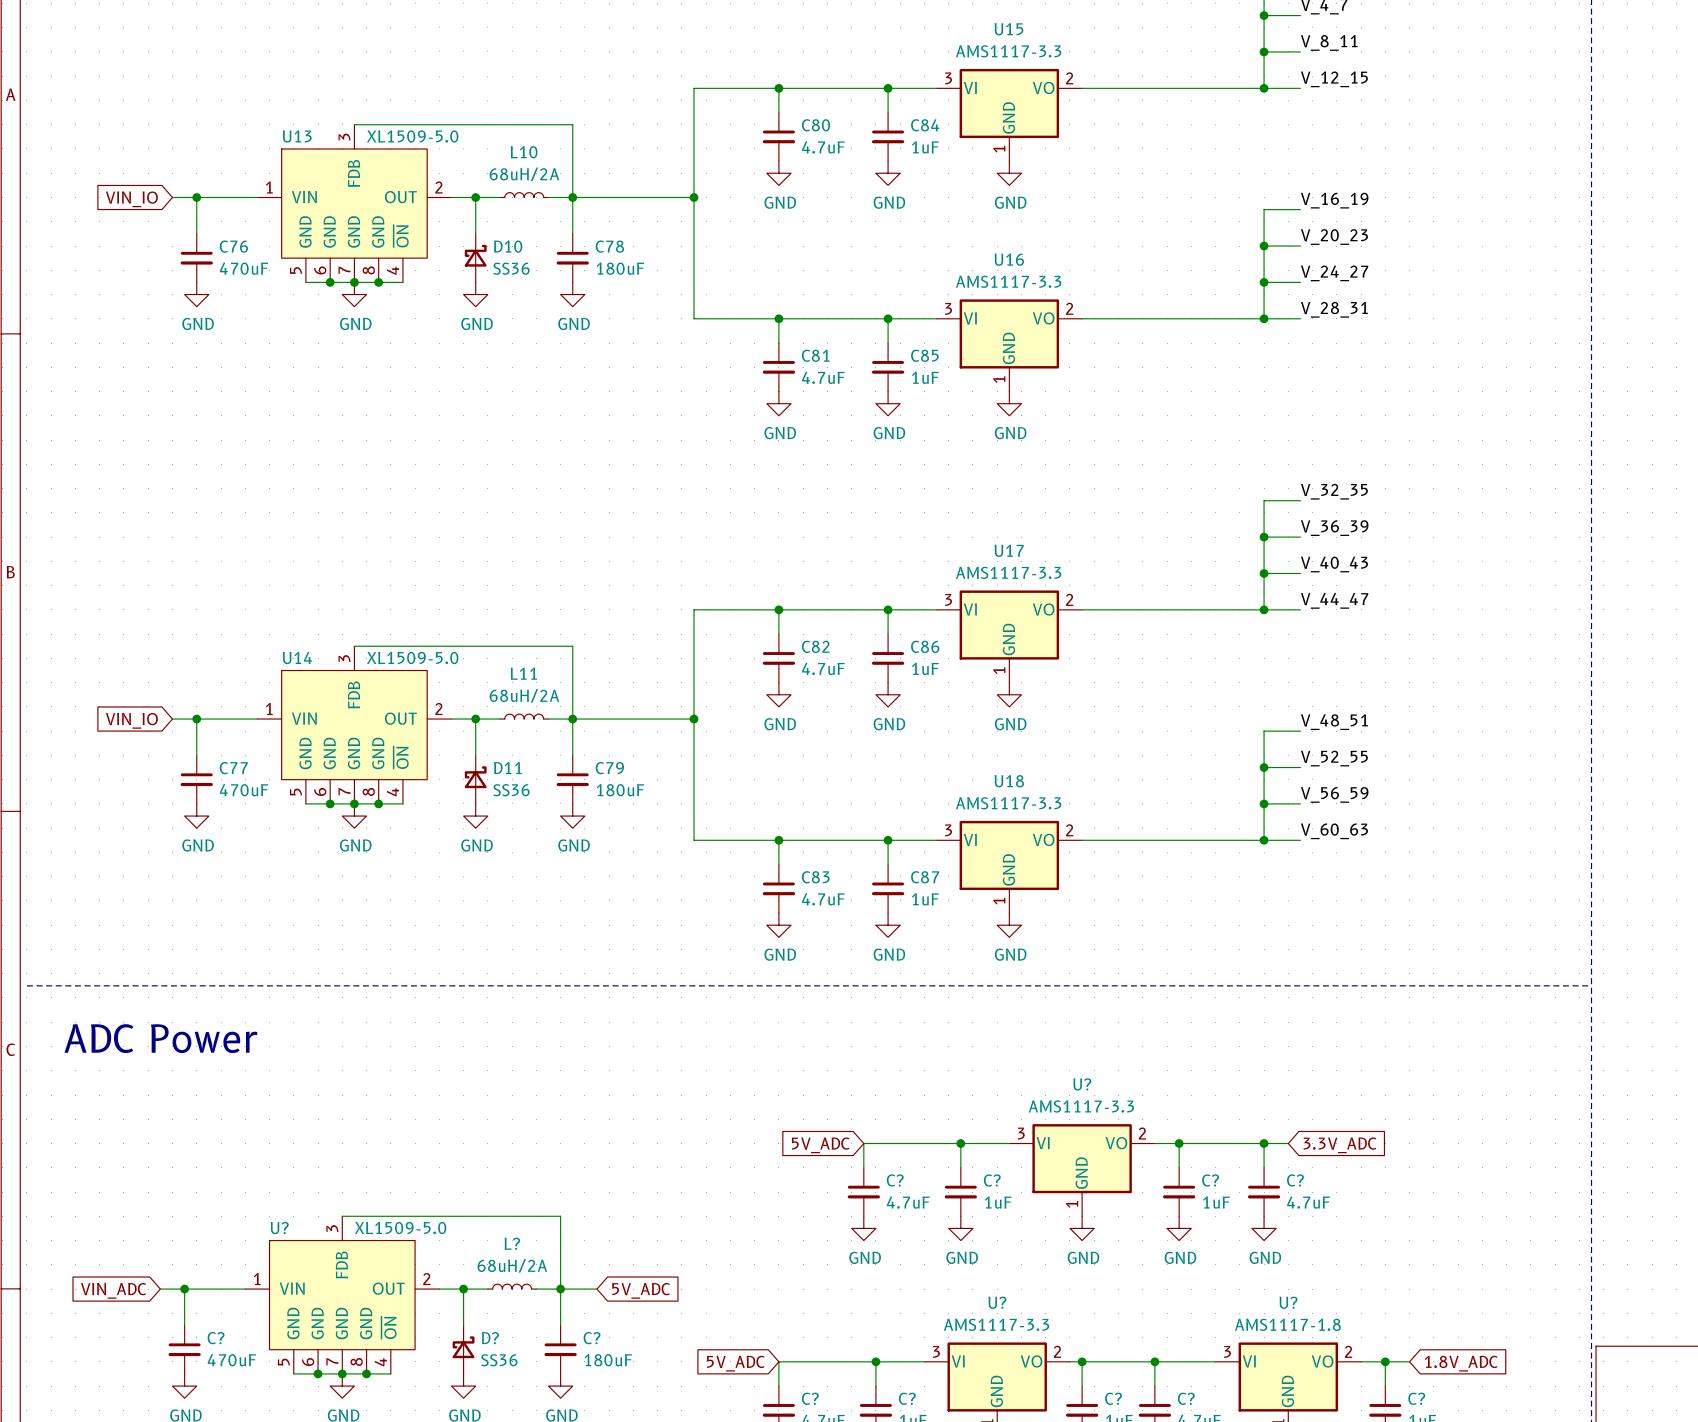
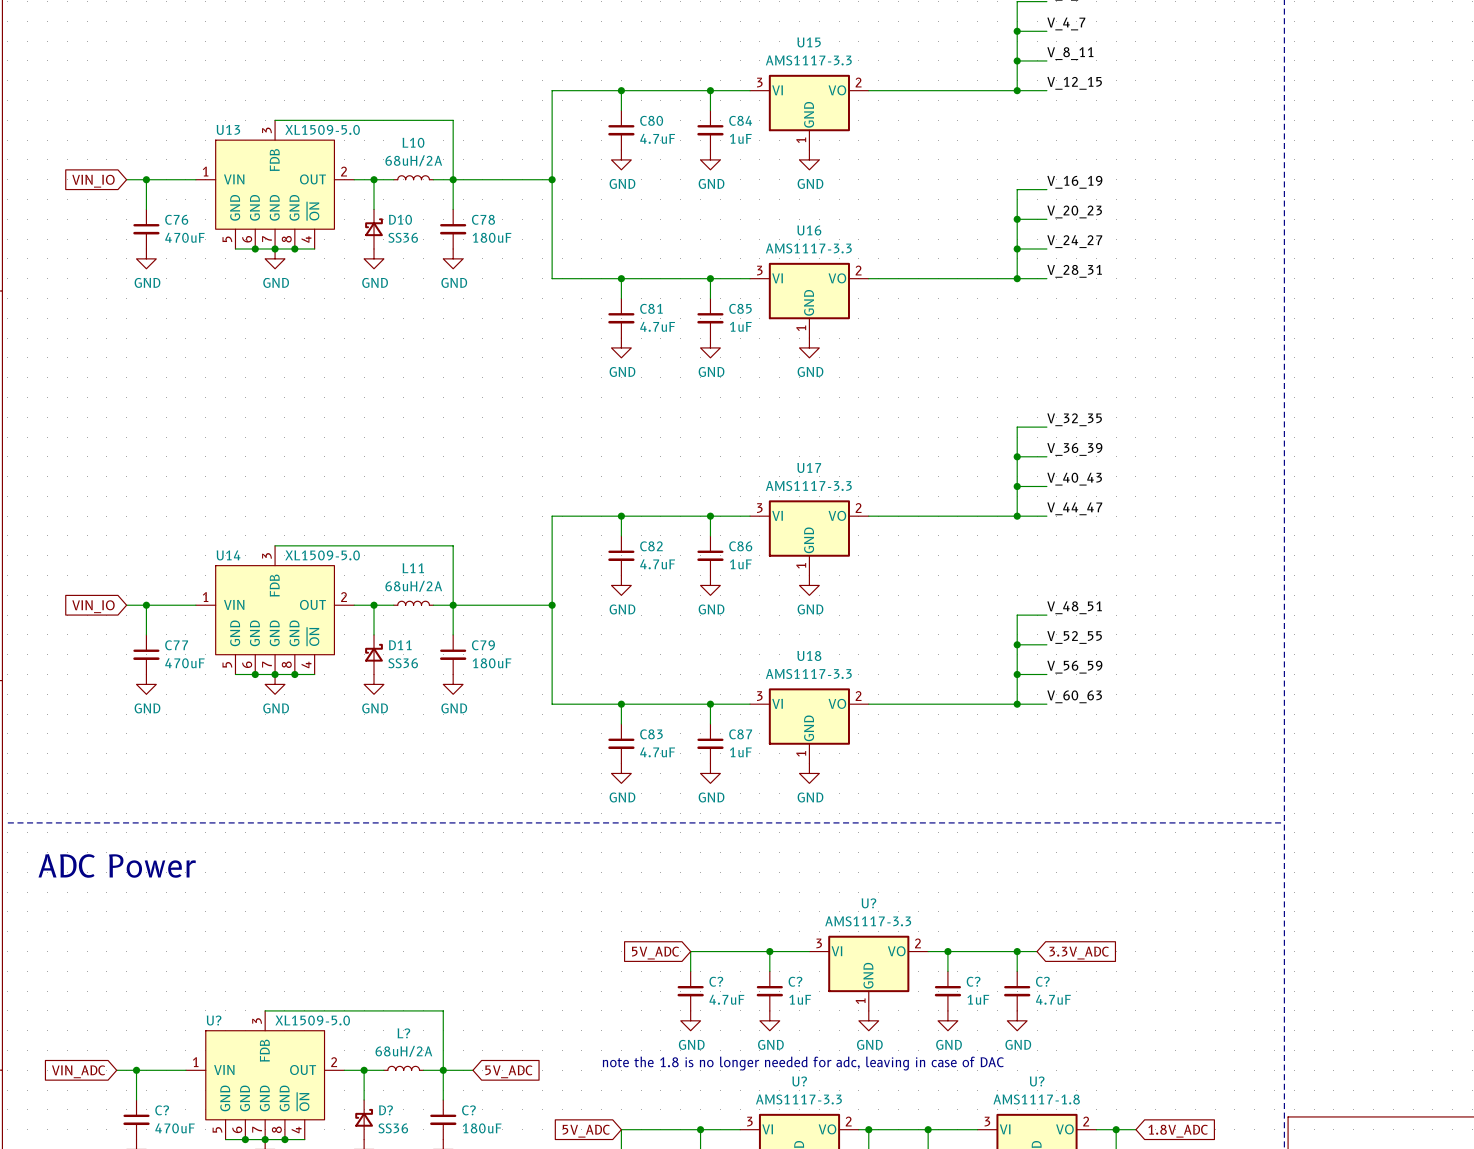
text: none -> note the 1.8 is no longer needed for adc, leaving in case of DAC (803, 1063)

